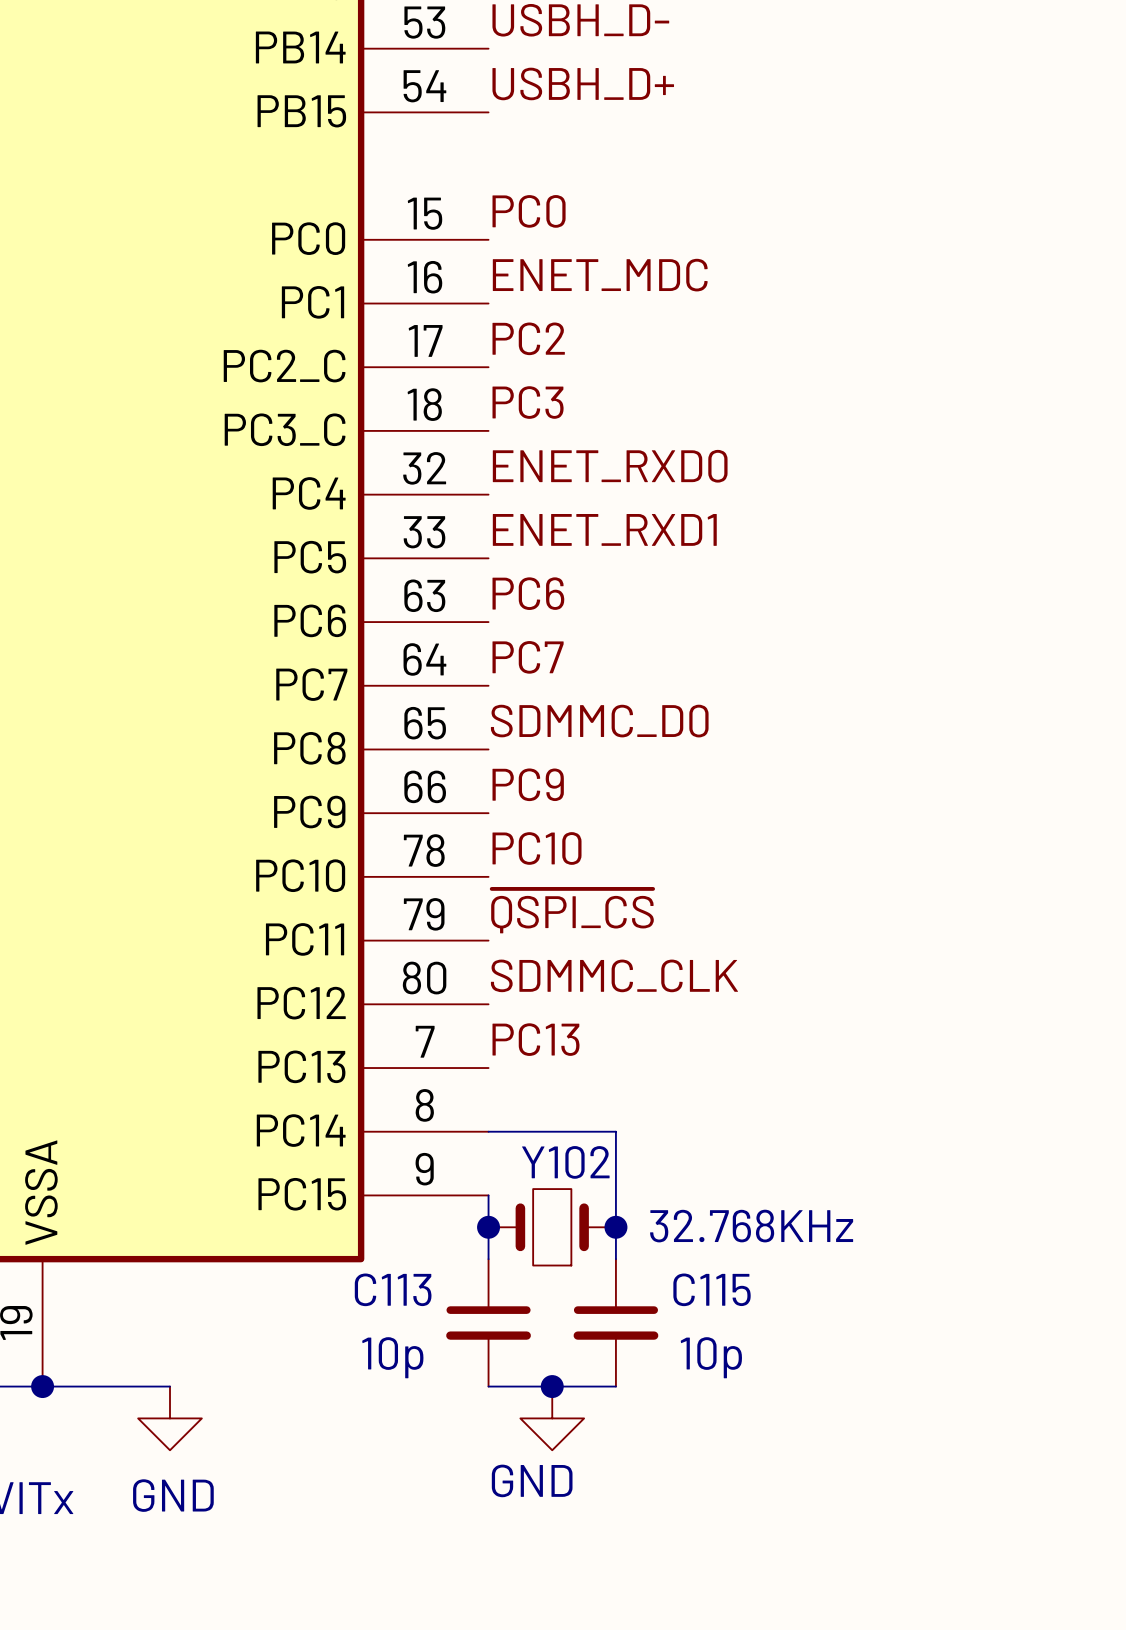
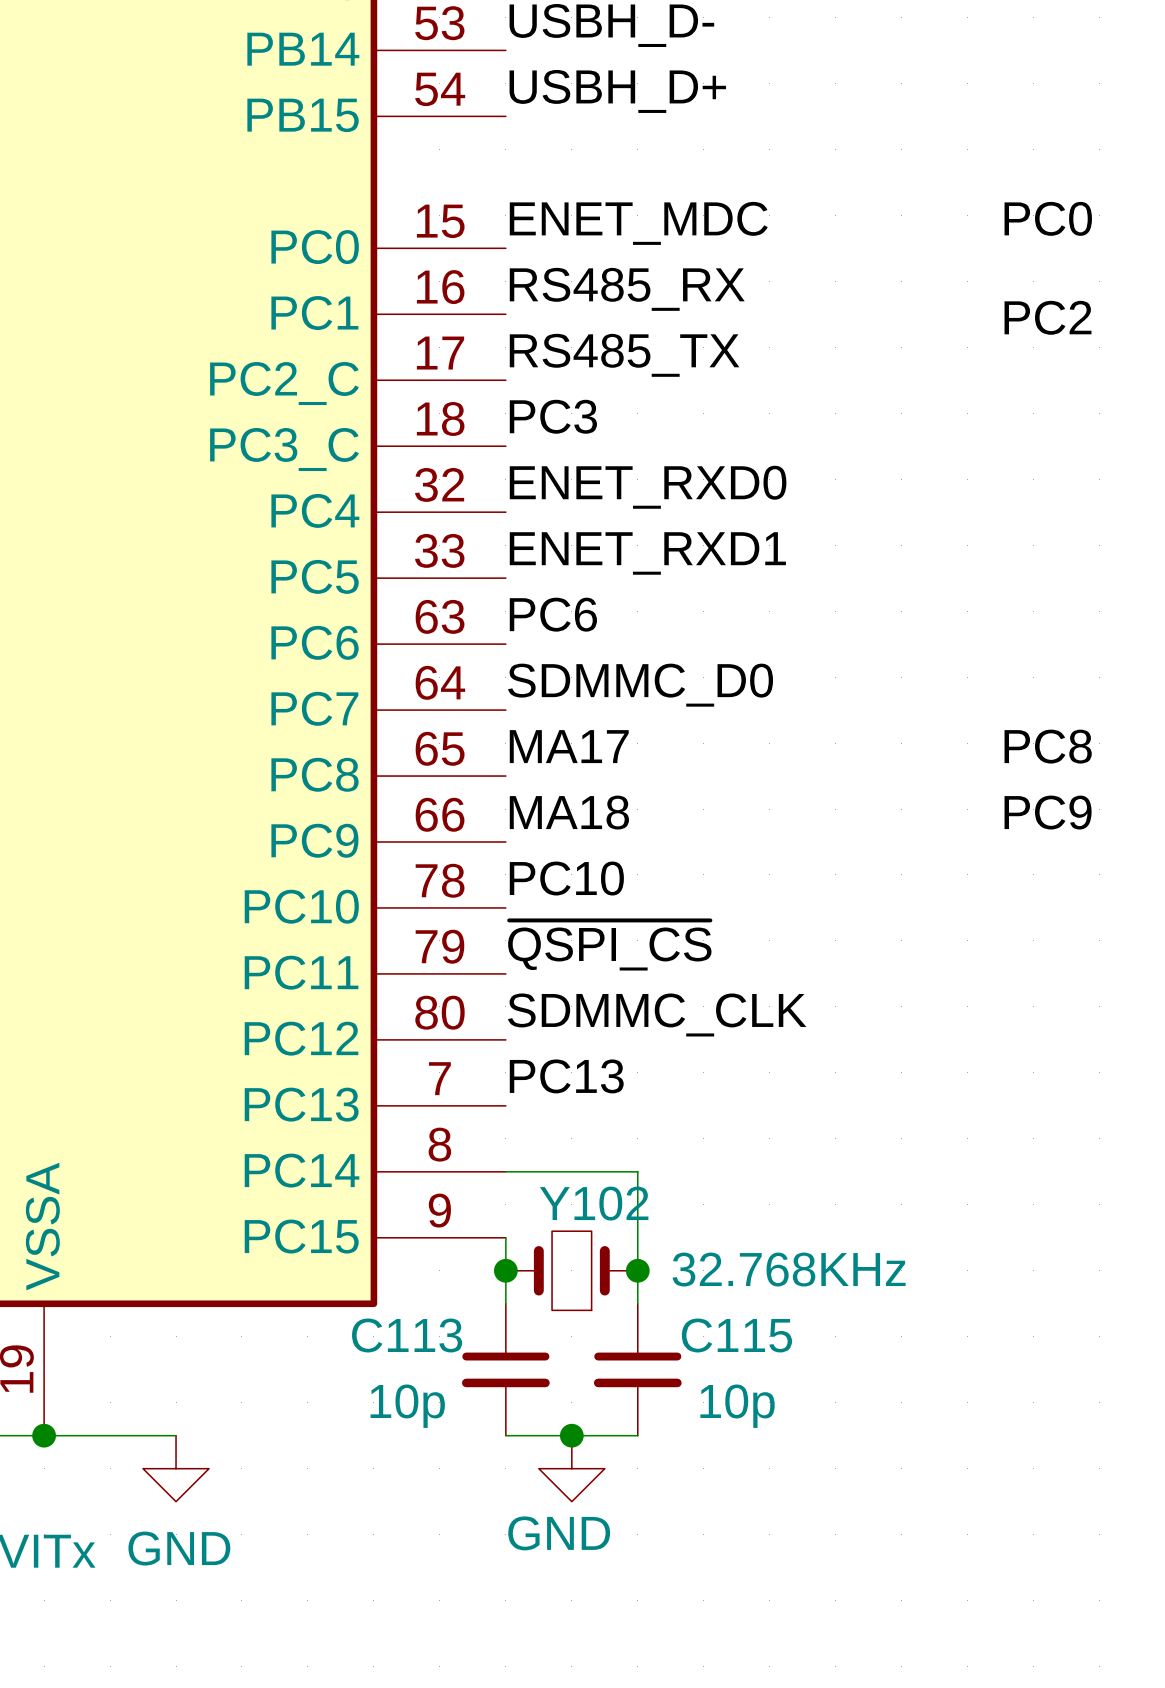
label: PC0 (529, 211) -> ENET_MDC (638, 223)
label: none -> PC0 (1048, 218)
label: ENET_MDC (600, 275) -> RS485_RX (627, 289)
label: none -> PC2 (1047, 317)
label: PC2 (528, 338) -> RS485_TX (624, 355)
label: PC7 (528, 657) -> SDMMC_D0 (640, 685)
label: SDMMC_D0 (599, 721) -> MA17 (569, 746)
label: none -> PC8 (1048, 746)
label: PC9 (528, 784) -> MA18 (569, 812)
label: none -> PC9 (1048, 812)

